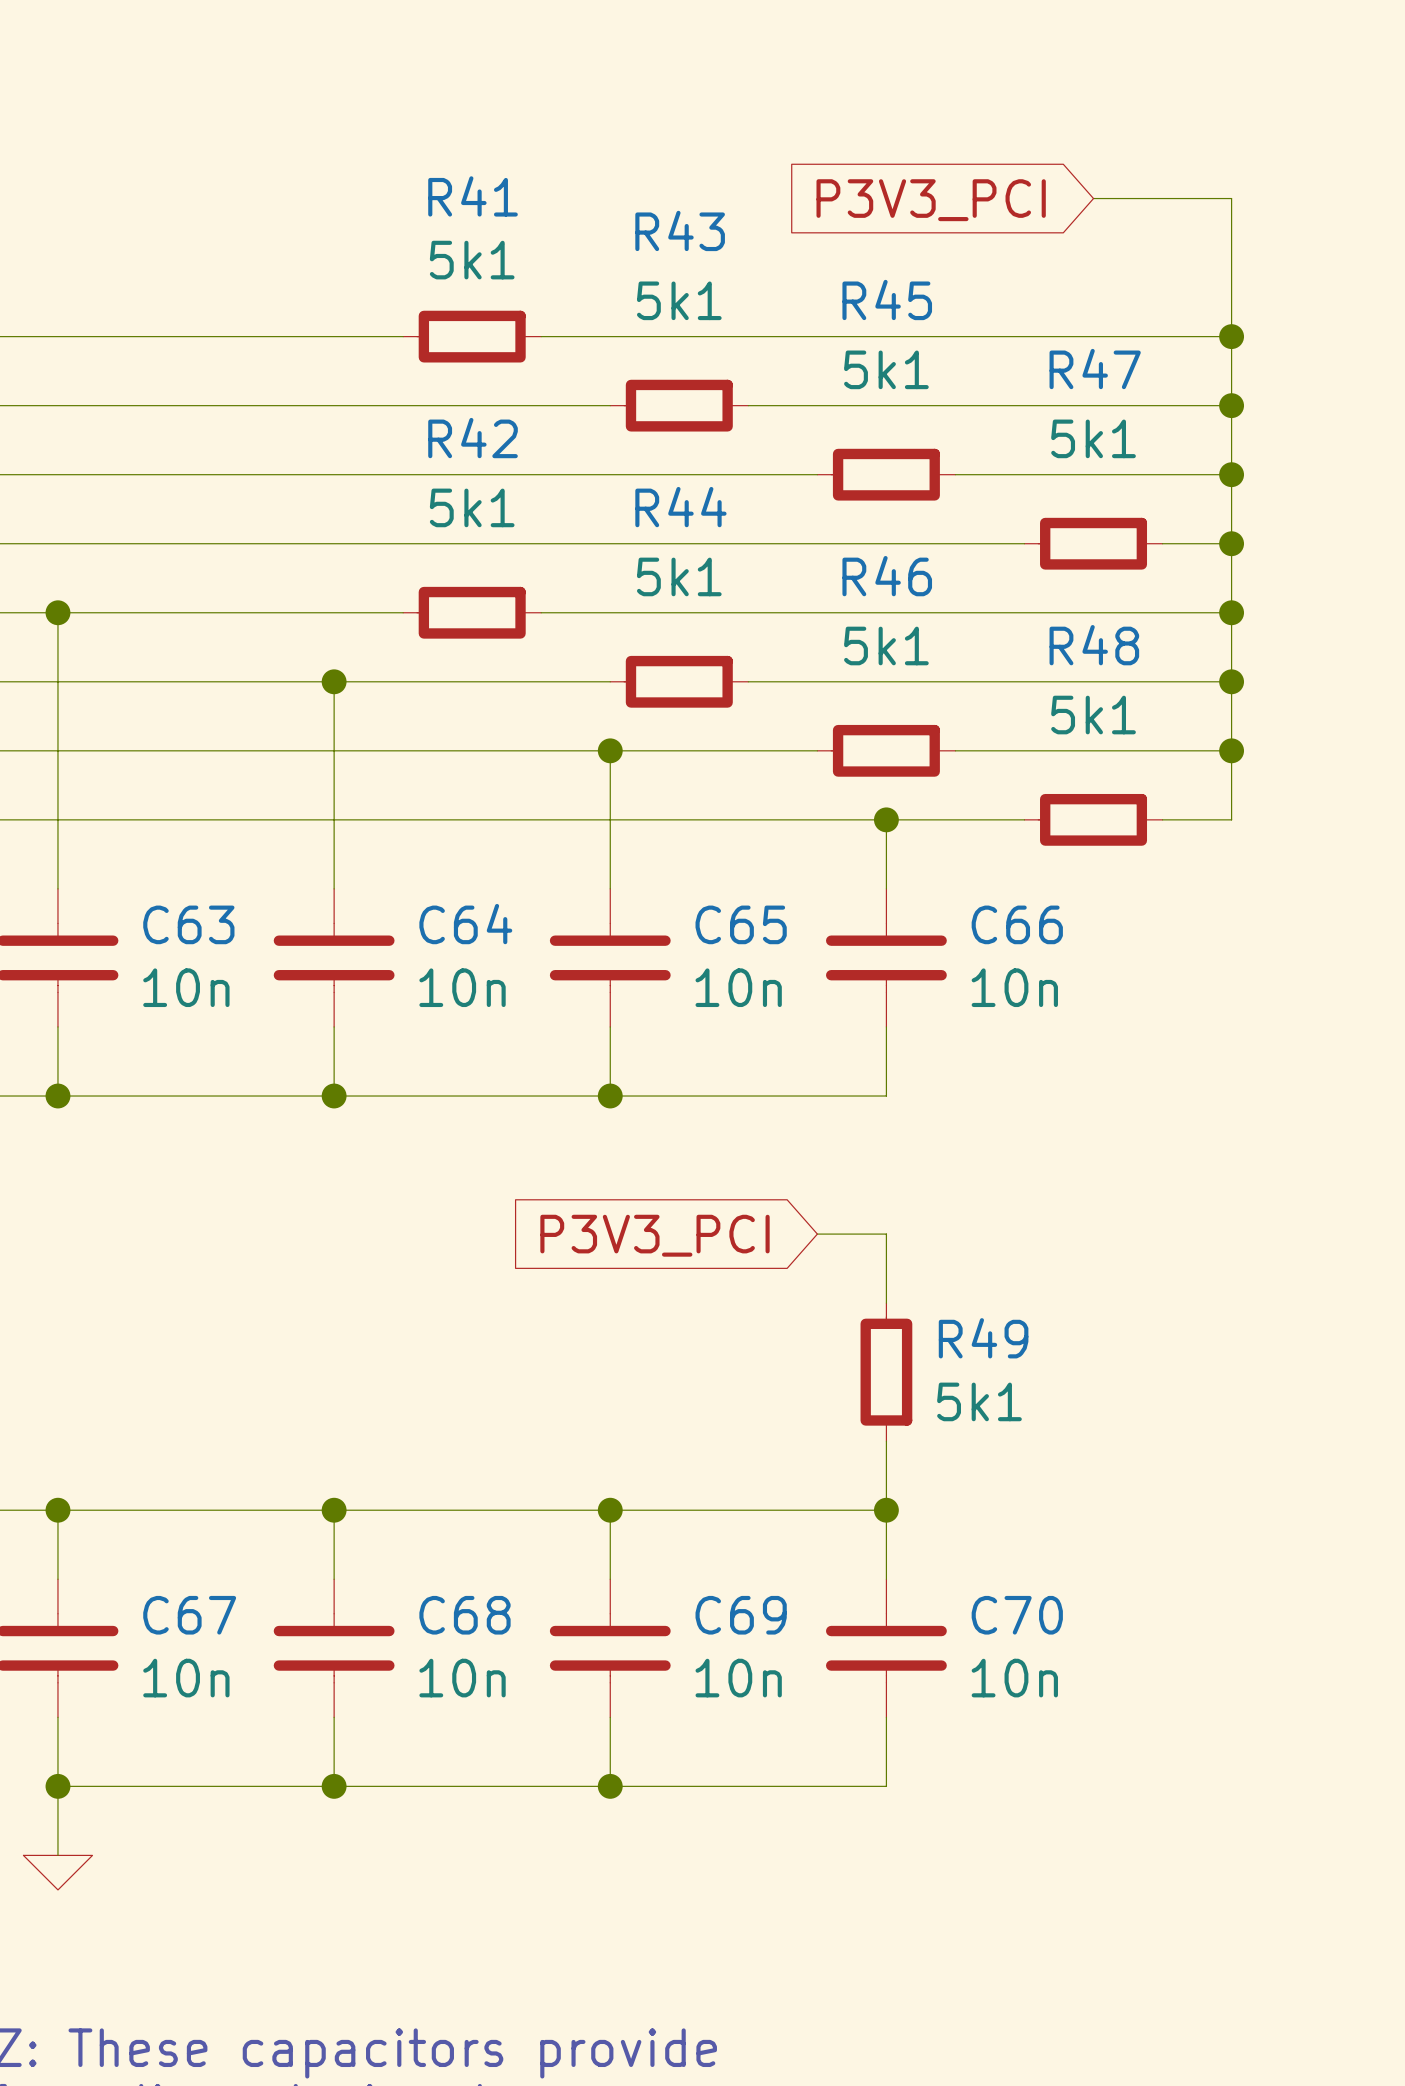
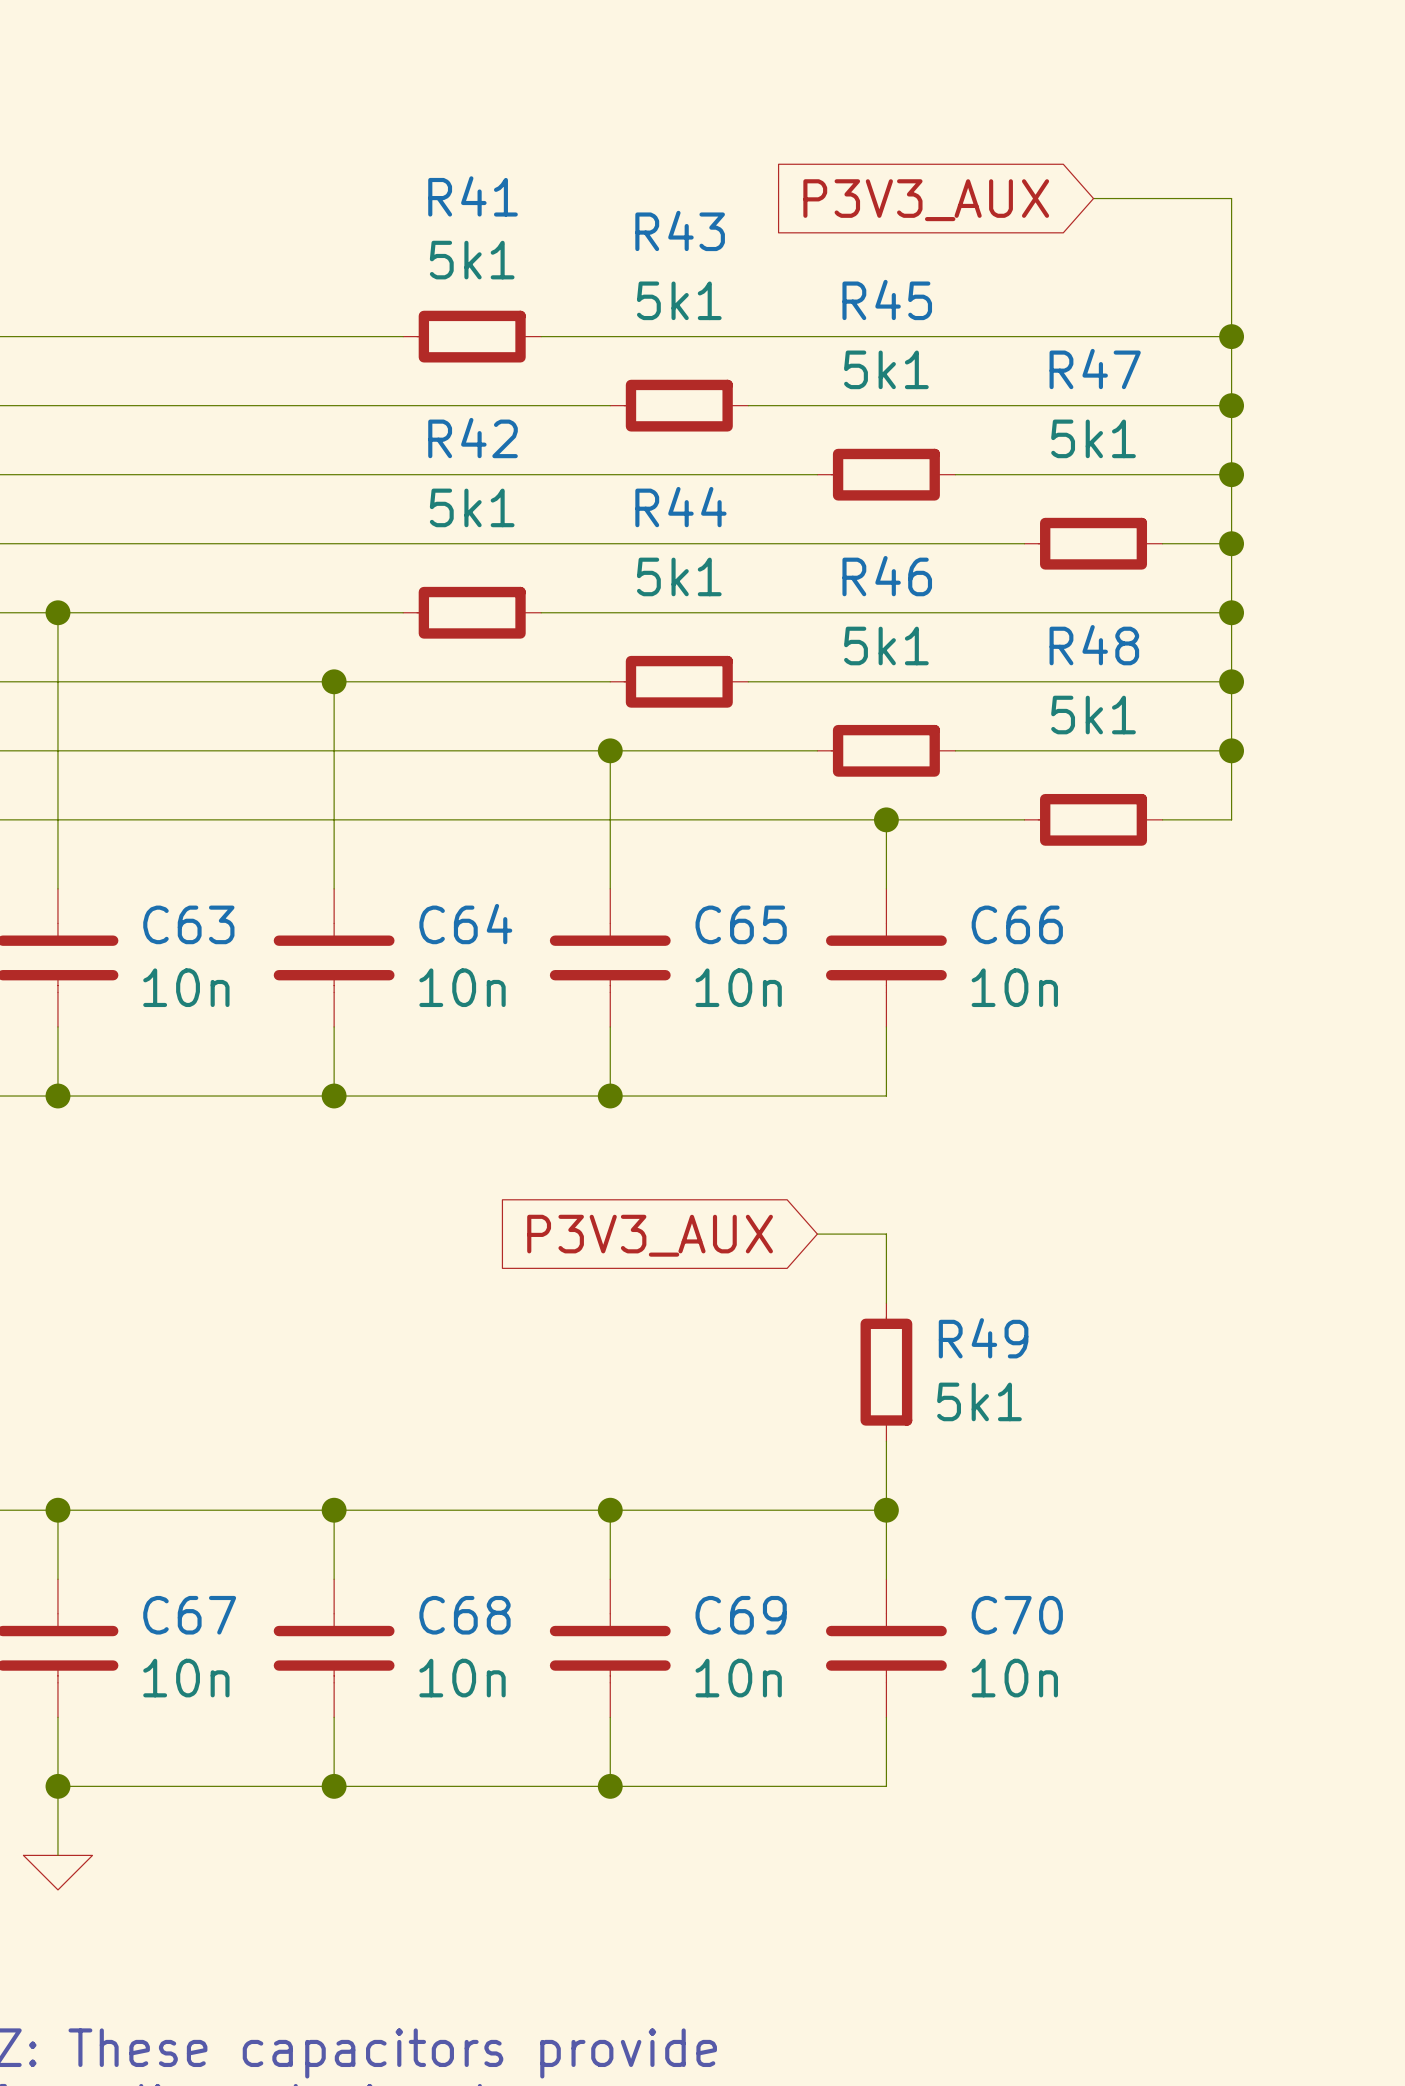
global label: P3V3_PCI (931, 200) -> P3V3_AUX (926, 200)
global label: P3V3_PCI (655, 1235) -> P3V3_AUX (650, 1235)

